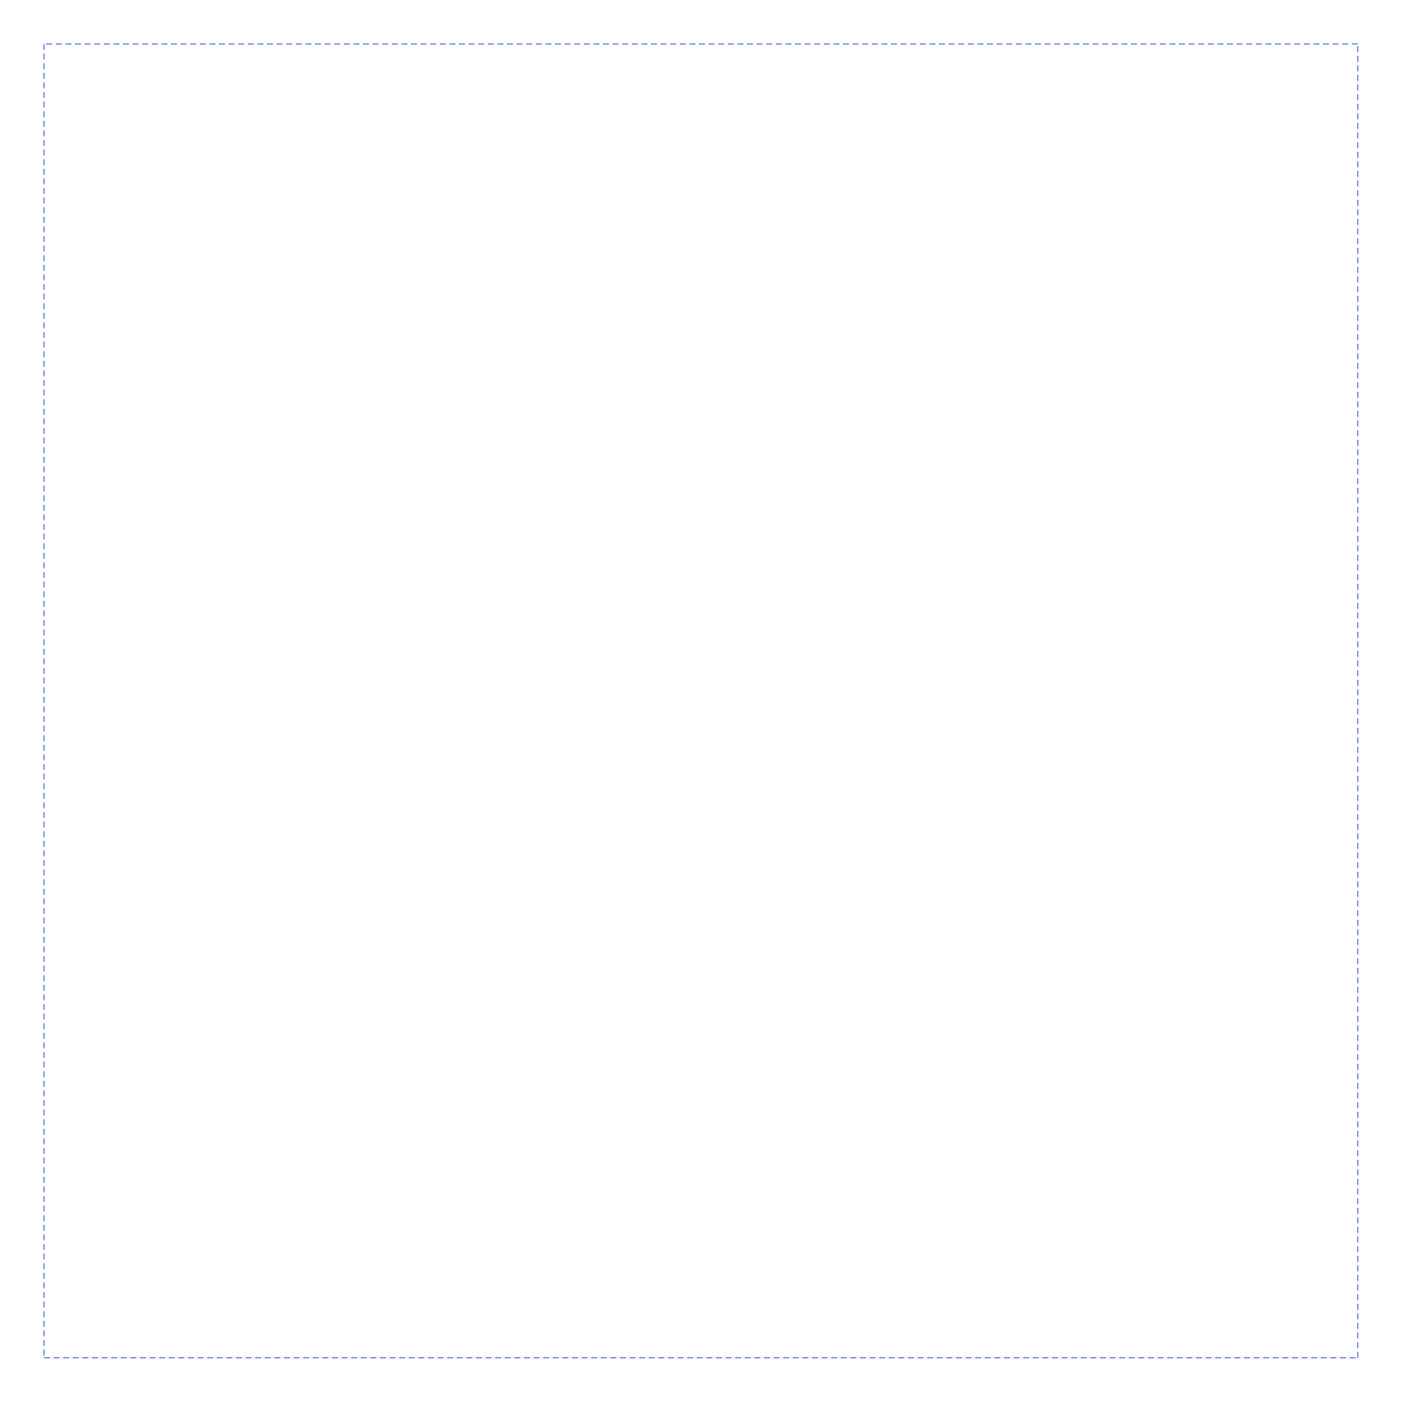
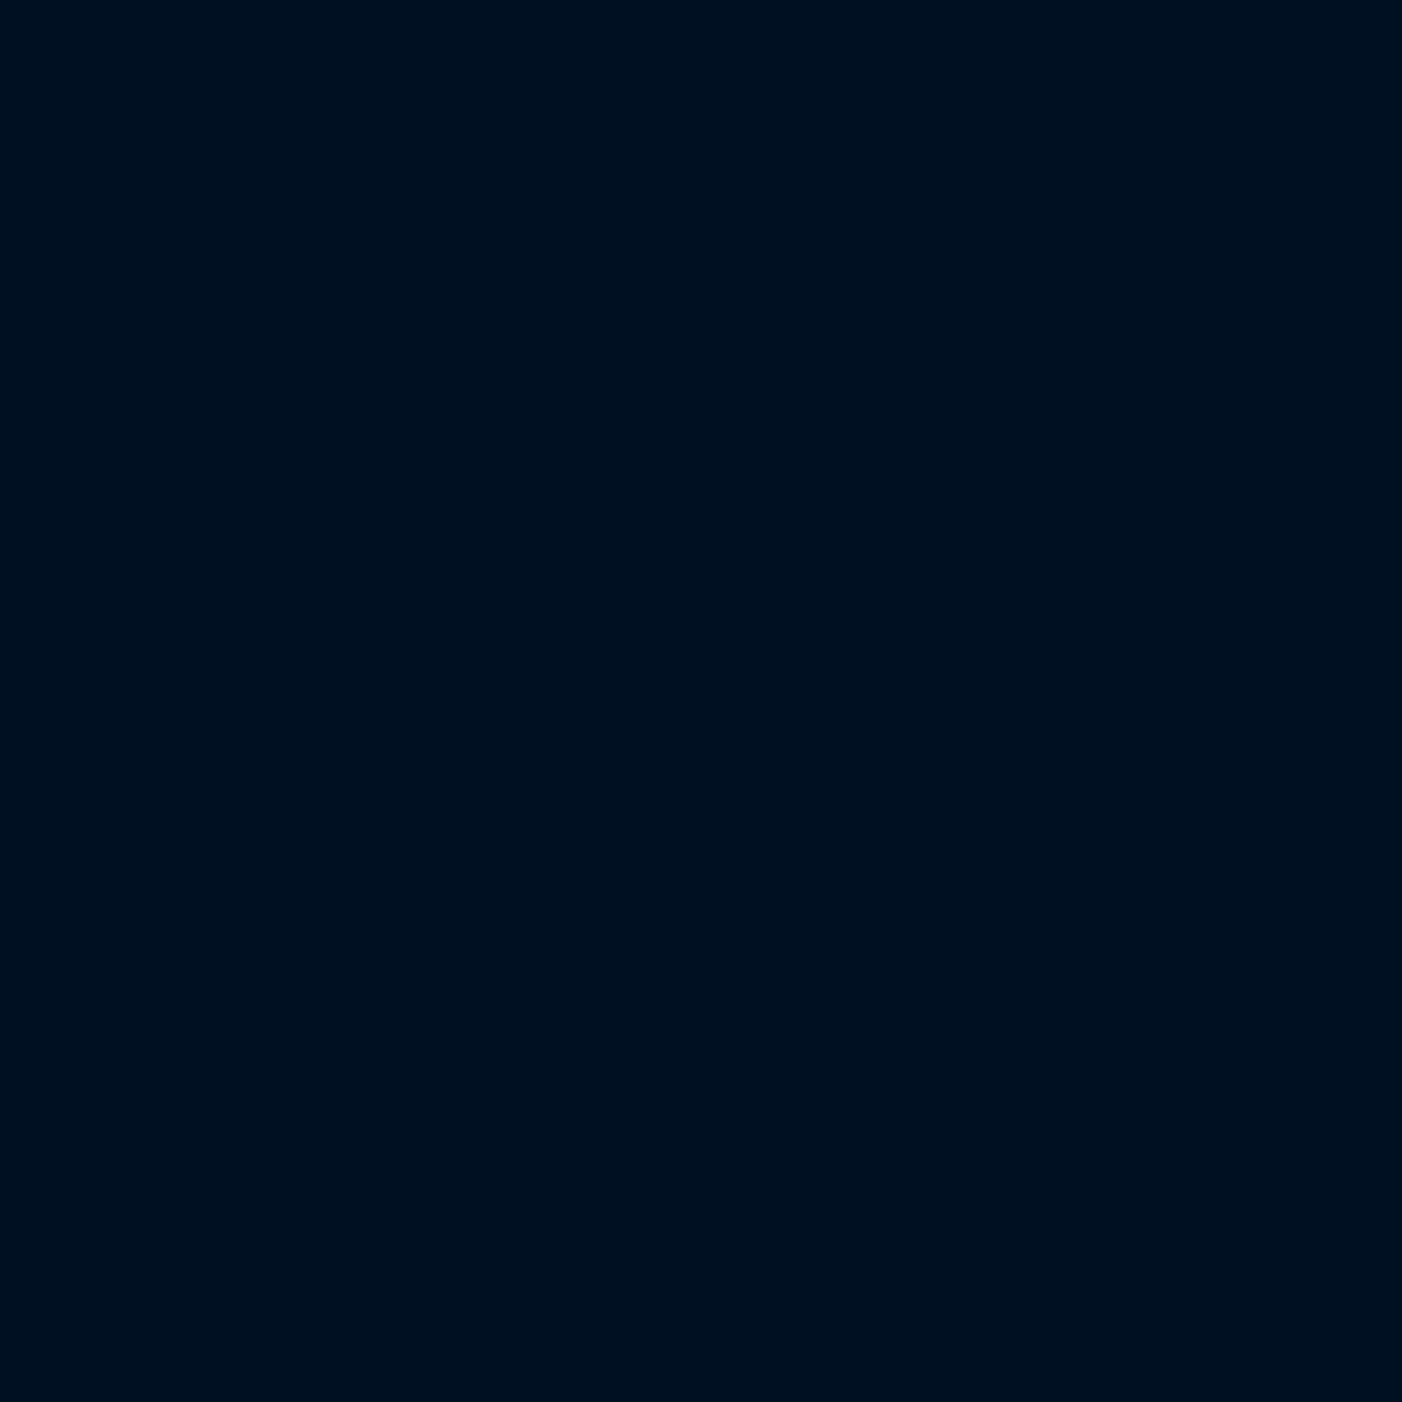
zone outline: (1357, 43) (43, 43) (43, 1357) (1357, 1357) (1357, 43) -> none

